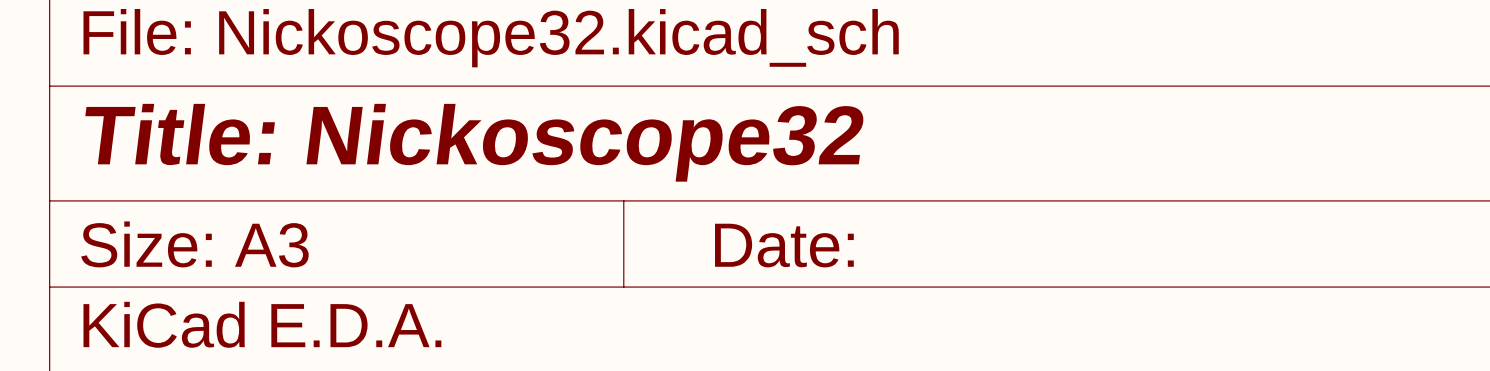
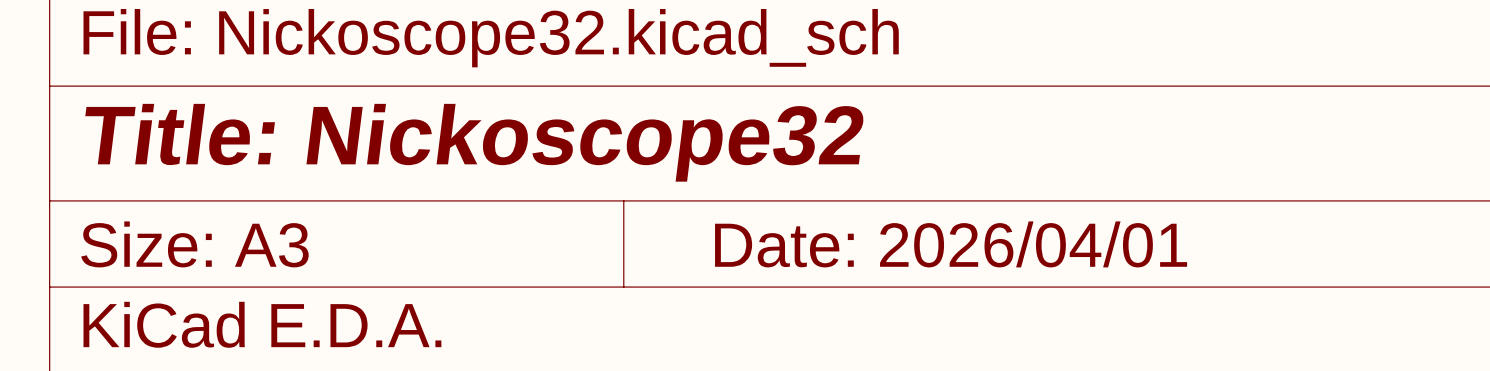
title block: Date: (784, 245) -> Date: 2026/04/01 (951, 244)

